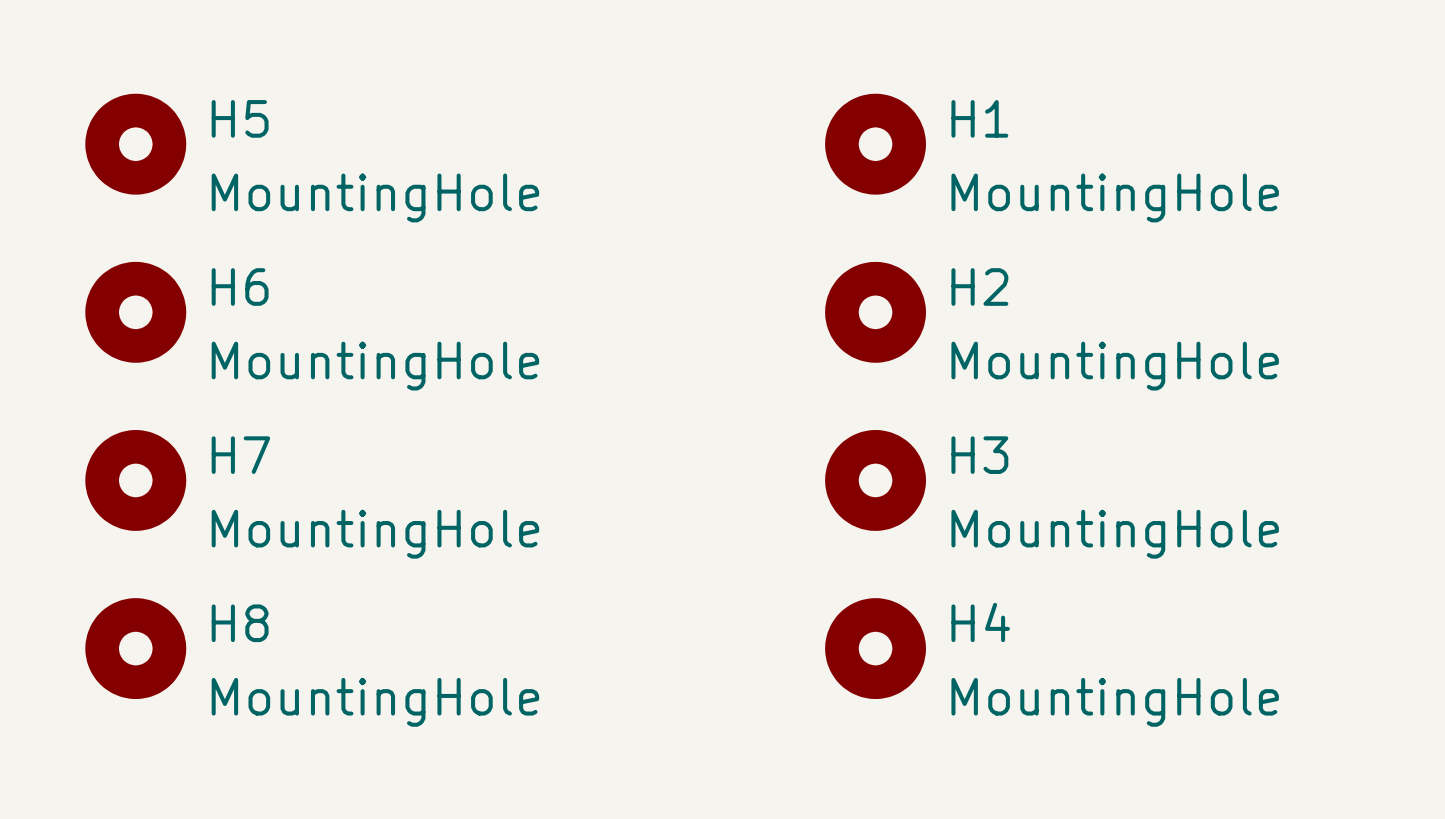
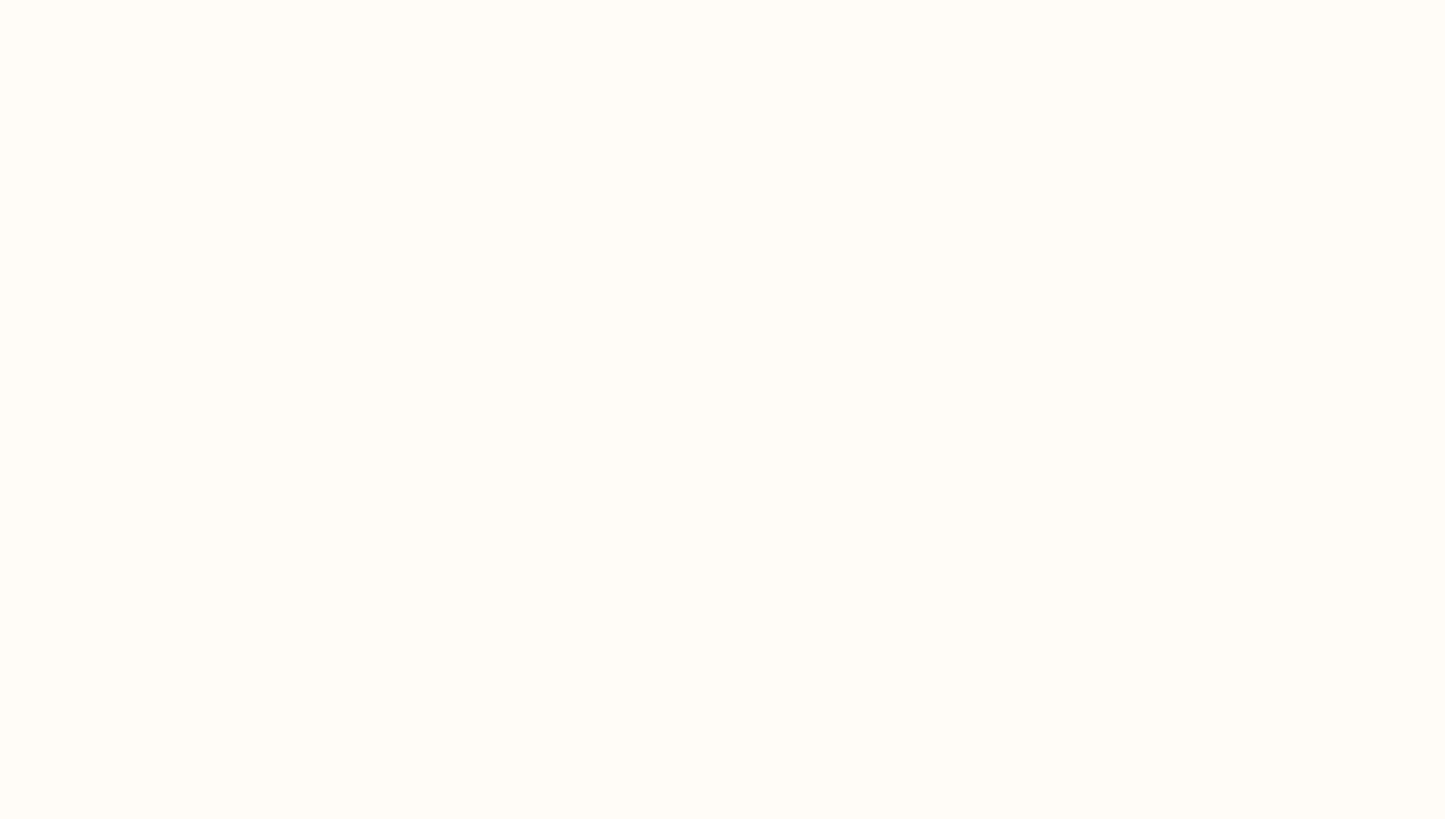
H5: MountingHole (135, 144) -> none
H1: MountingHole (875, 144) -> none
H6: MountingHole (135, 312) -> none
H2: MountingHole (875, 312) -> none
H7: MountingHole (135, 480) -> none
H3: MountingHole (875, 480) -> none
H8: MountingHole (135, 648) -> none
H4: MountingHole (875, 648) -> none

